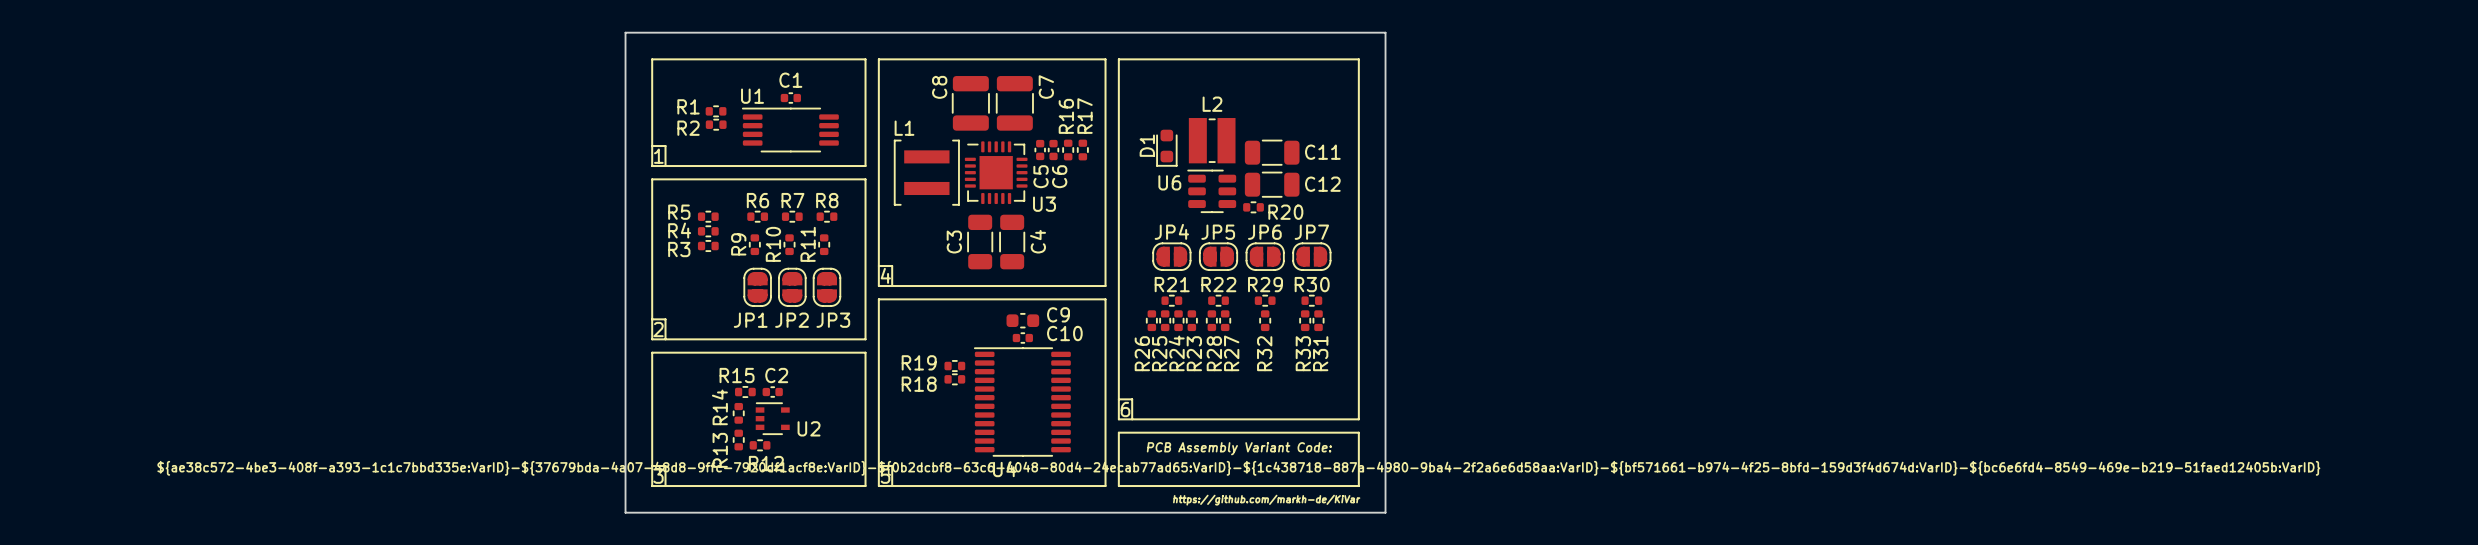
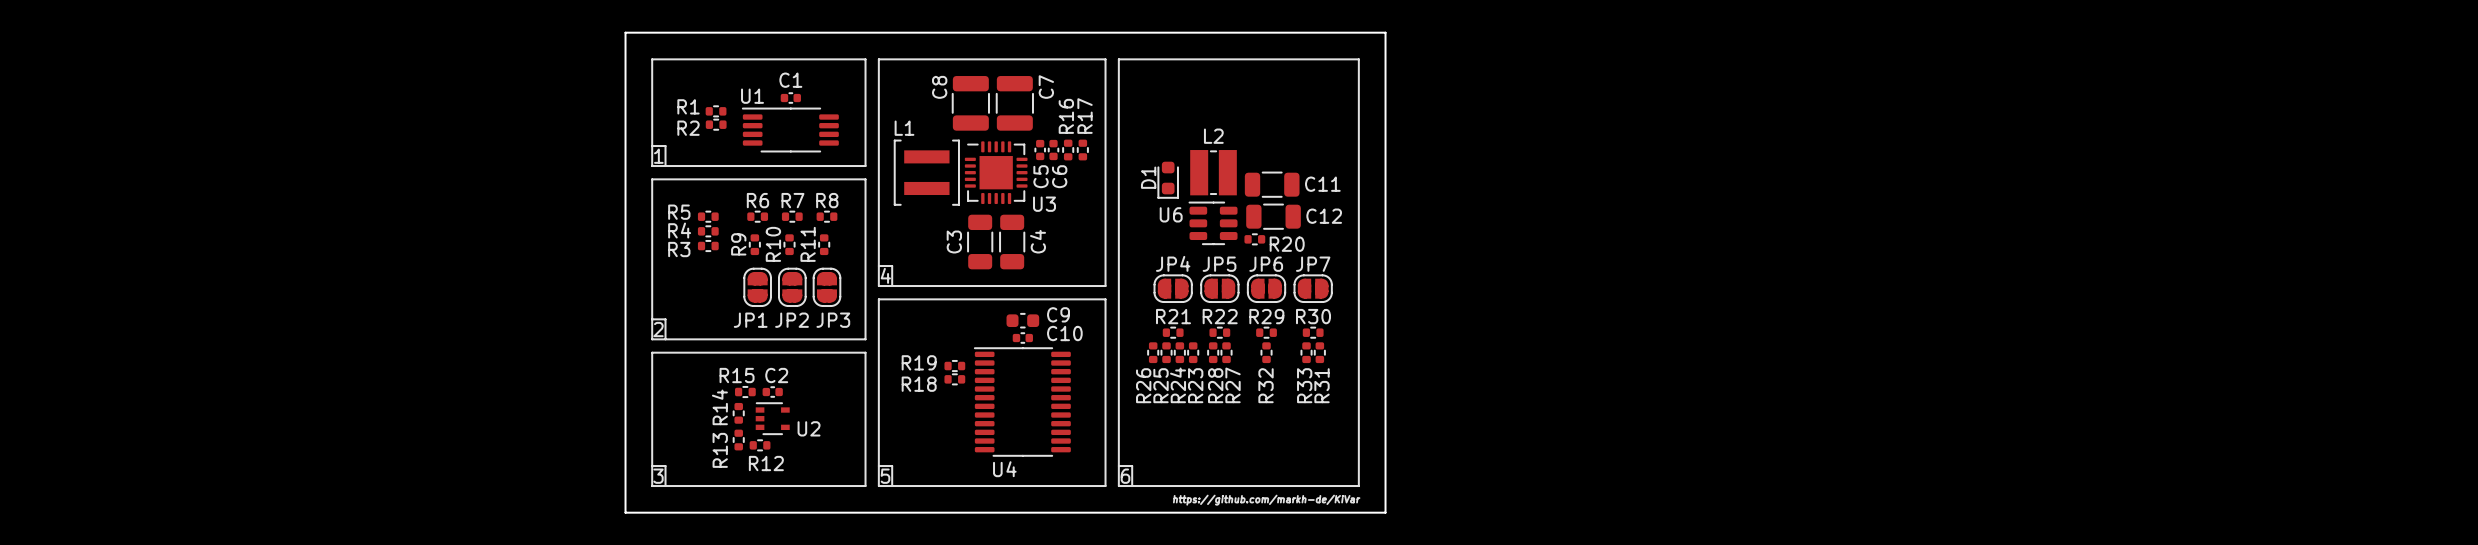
L2 position: (1212, 140) -> (1213, 172)
D1 position: (1166, 148) -> (1168, 180)
C11: (1272, 152) -> none
C12 name: C12 (1322, 184) -> C11 (1322, 184)
U6 position: (1211, 191) -> (1213, 223)
R20 position: (1253, 207) -> (1254, 239)
C12: none -> (1273, 216)
JP4 position: (1171, 256) -> (1173, 288)
JP5 position: (1218, 256) -> (1219, 288)
JP6 position: (1265, 256) -> (1266, 288)
JP7 position: (1311, 256) -> (1313, 288)
R21 position: (1171, 300) -> (1173, 332)
R22 position: (1218, 300) -> (1219, 332)
R29 position: (1265, 300) -> (1266, 332)
R30 position: (1311, 300) -> (1313, 332)
R26 position: (1151, 320) -> (1153, 352)
R25 position: (1165, 320) -> (1166, 352)
R24 position: (1178, 320) -> (1179, 352)
R23 position: (1191, 320) -> (1193, 352)
R28 position: (1211, 320) -> (1213, 352)
R27 position: (1225, 320) -> (1226, 352)
R32 position: (1265, 320) -> (1266, 352)
R33 position: (1305, 320) -> (1306, 352)
R31 position: (1318, 320) -> (1319, 352)
line: (1118, 399) (1132, 399) (1132, 419) -> (1118, 466) (1132, 466) (1132, 486)
text position: 6 (1125, 409) -> 6 (1125, 476)
line: (1118, 419) (1358, 419) -> (1118, 419) (1118, 432)
line: (1118, 432) (1358, 432) -> (1358, 419) (1358, 432)
text: PCB Assembly Variant Code: (1239, 448) -> none
text: ${ae38c572-4be3-408f-a393-1c1c7bbd335e:VarID}-${37679bda-4a07-48d8-9ffc-7920df1acf8e:VarID}-${0b2dcbf8-63c6-4048-80d4-24ecab77ad65:VarID}-${1c438718-887a-4980-9ba4-2f2a6e6d58aa:VarID}-${bf571661-b974-4f25-8bfd-159d3f4d674d:VarID}-${bc6e6fd4-8549-469e-b219-51faed12405b:VarID} (1238, 468) -> none

